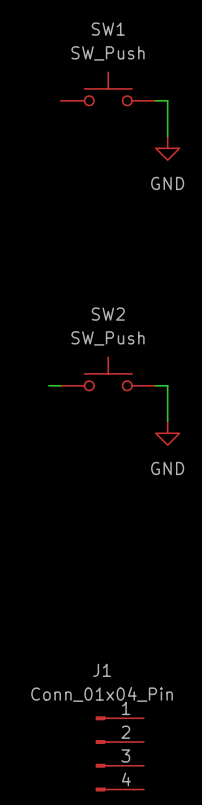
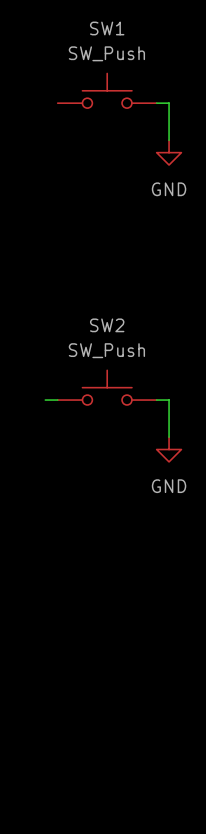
J1: Conn_01x04_Pin (119, 753) -> none

